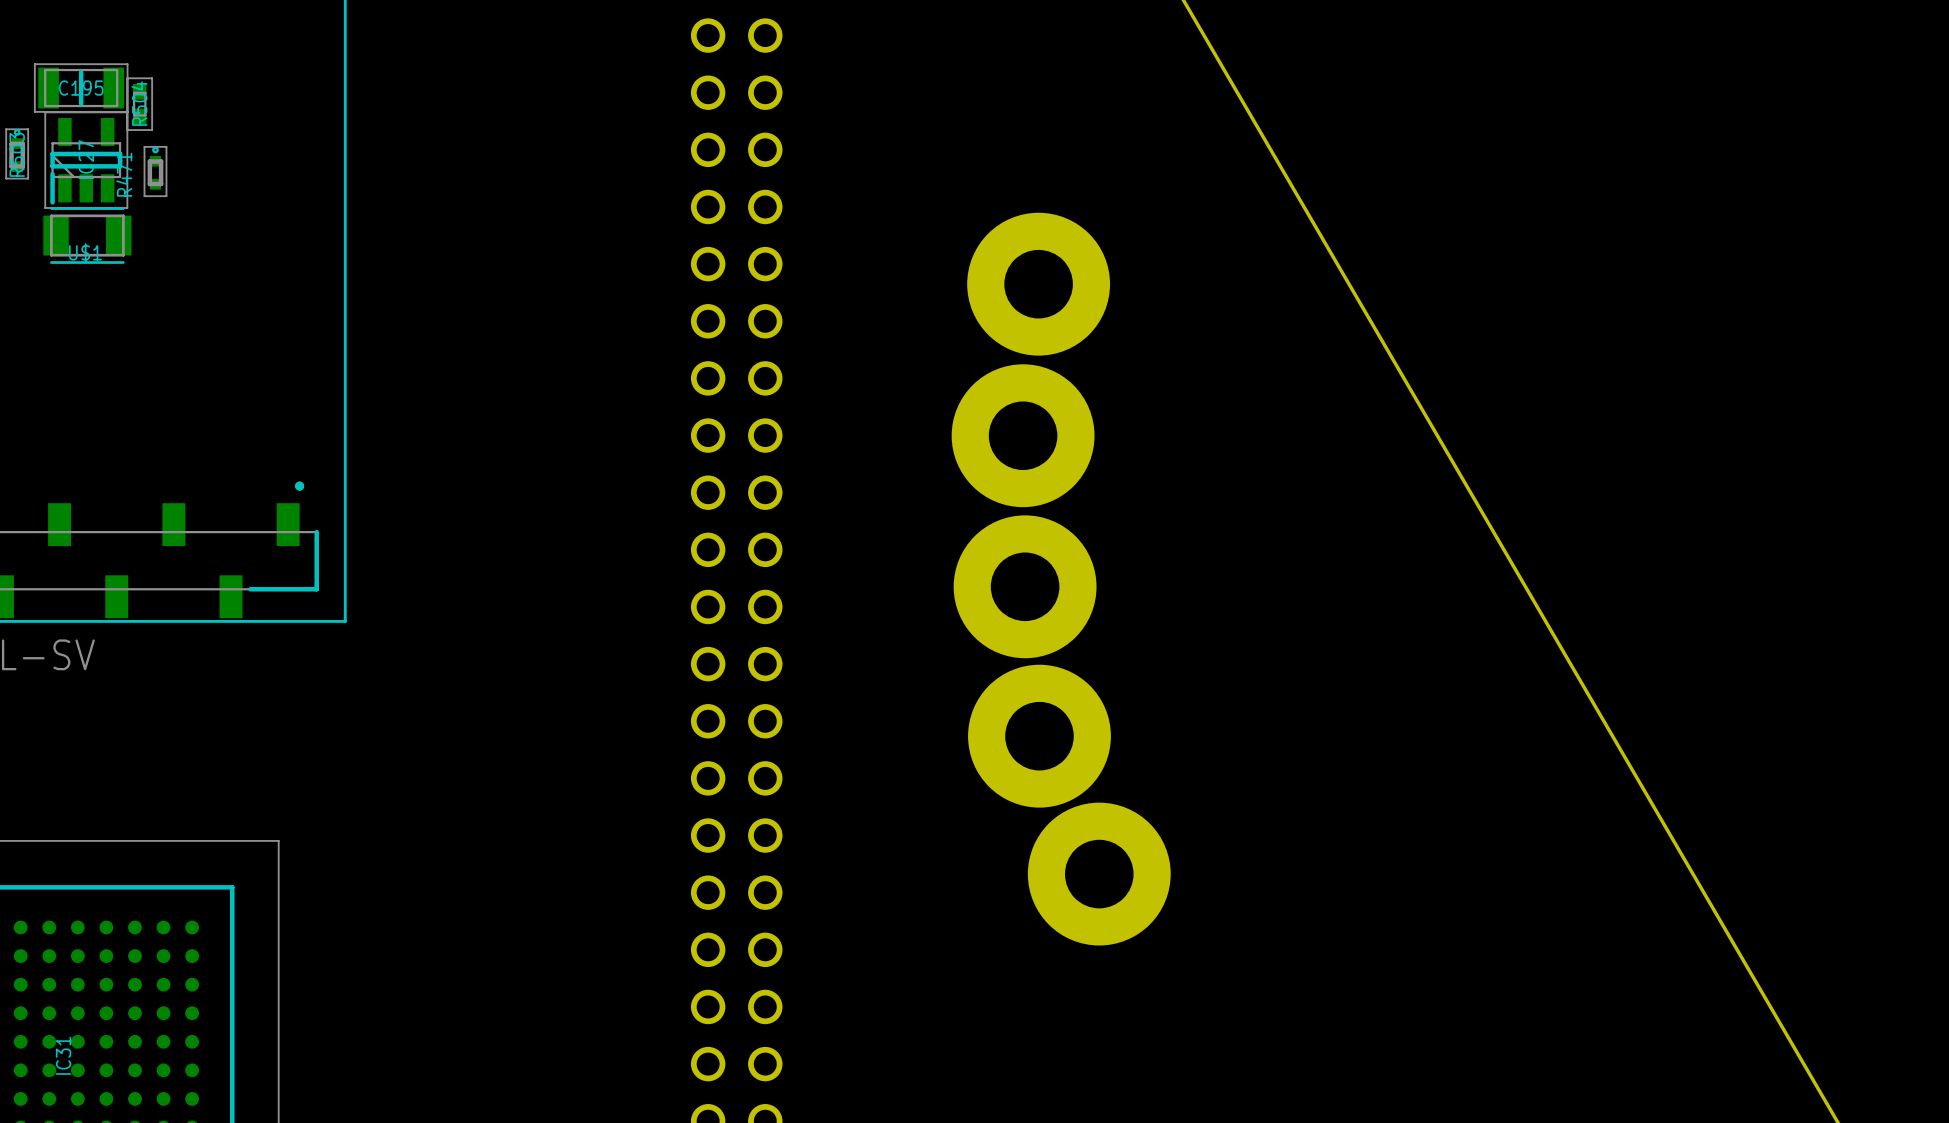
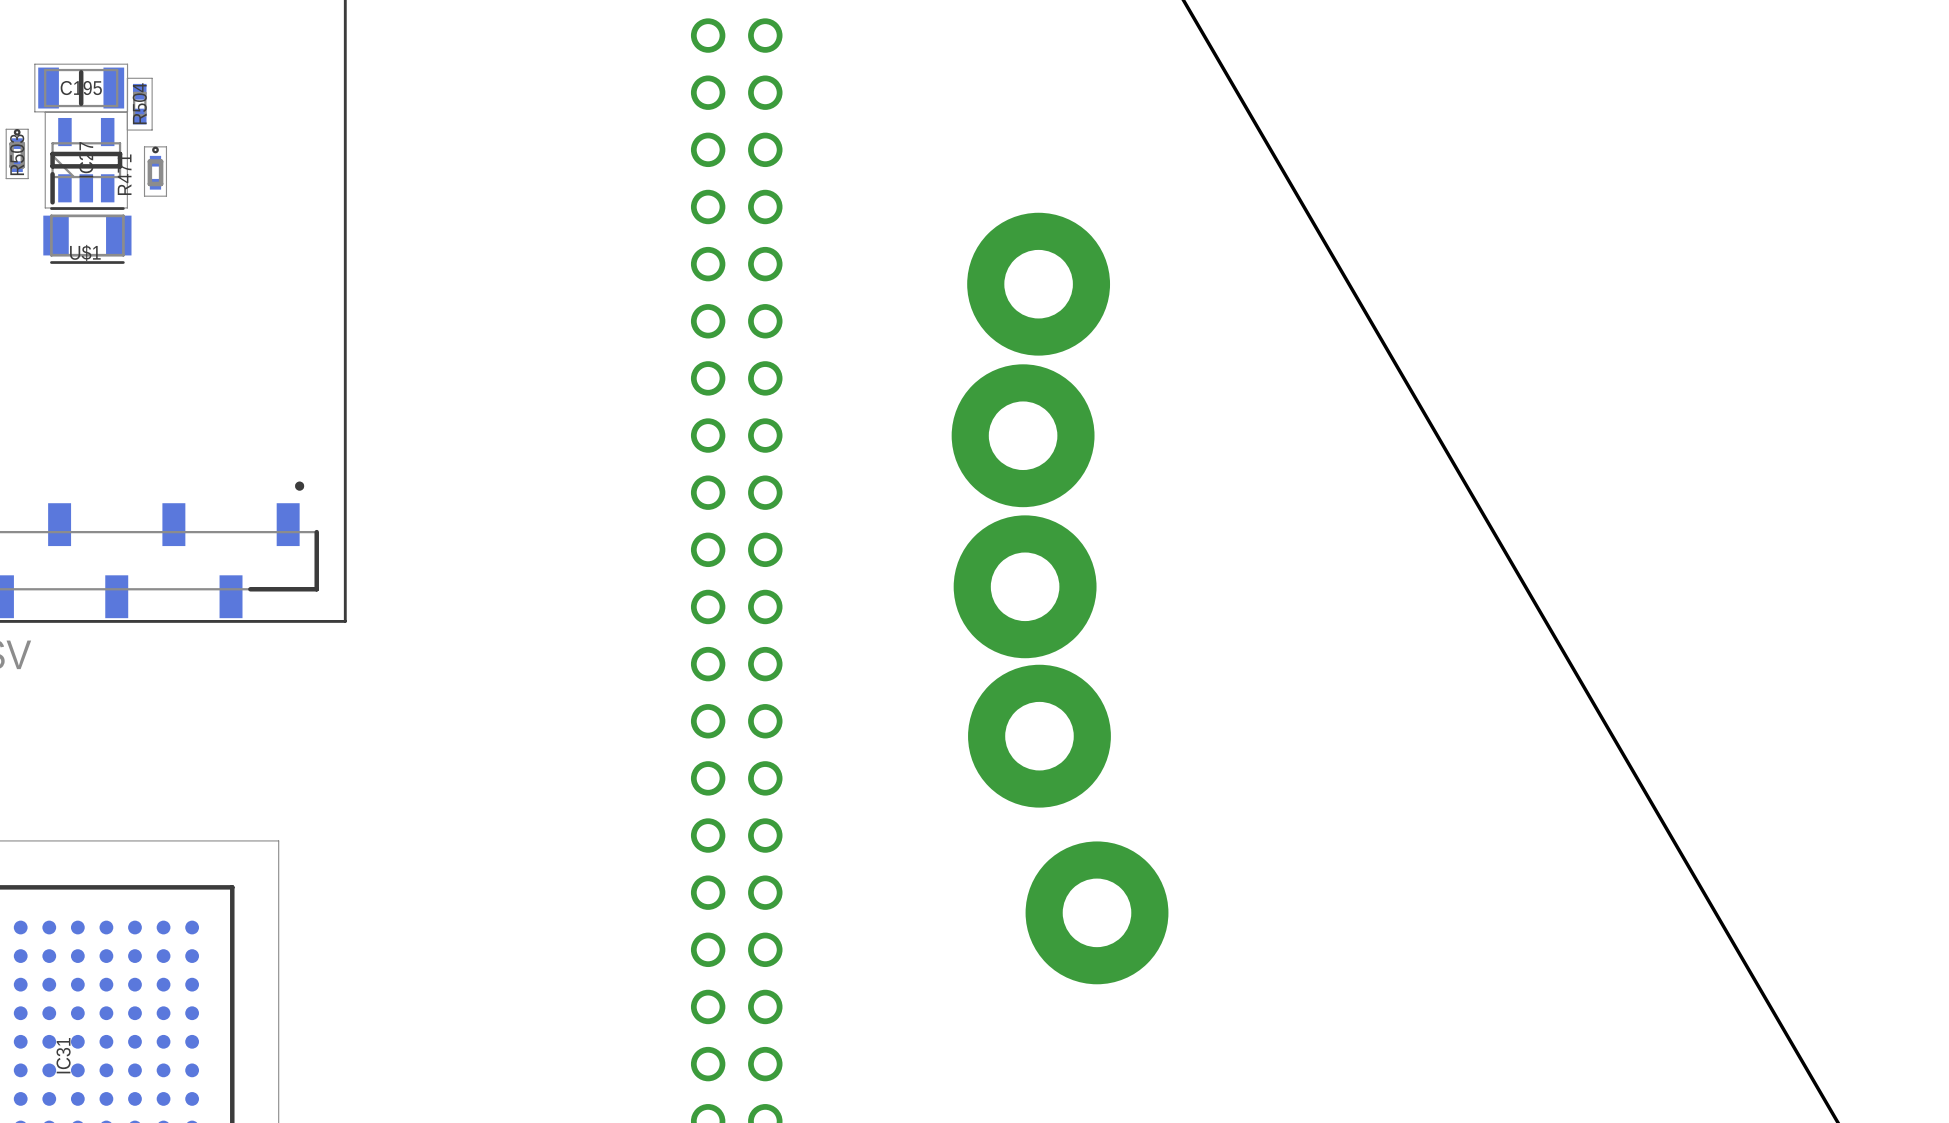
part position: (1099, 874) -> (1097, 912)

